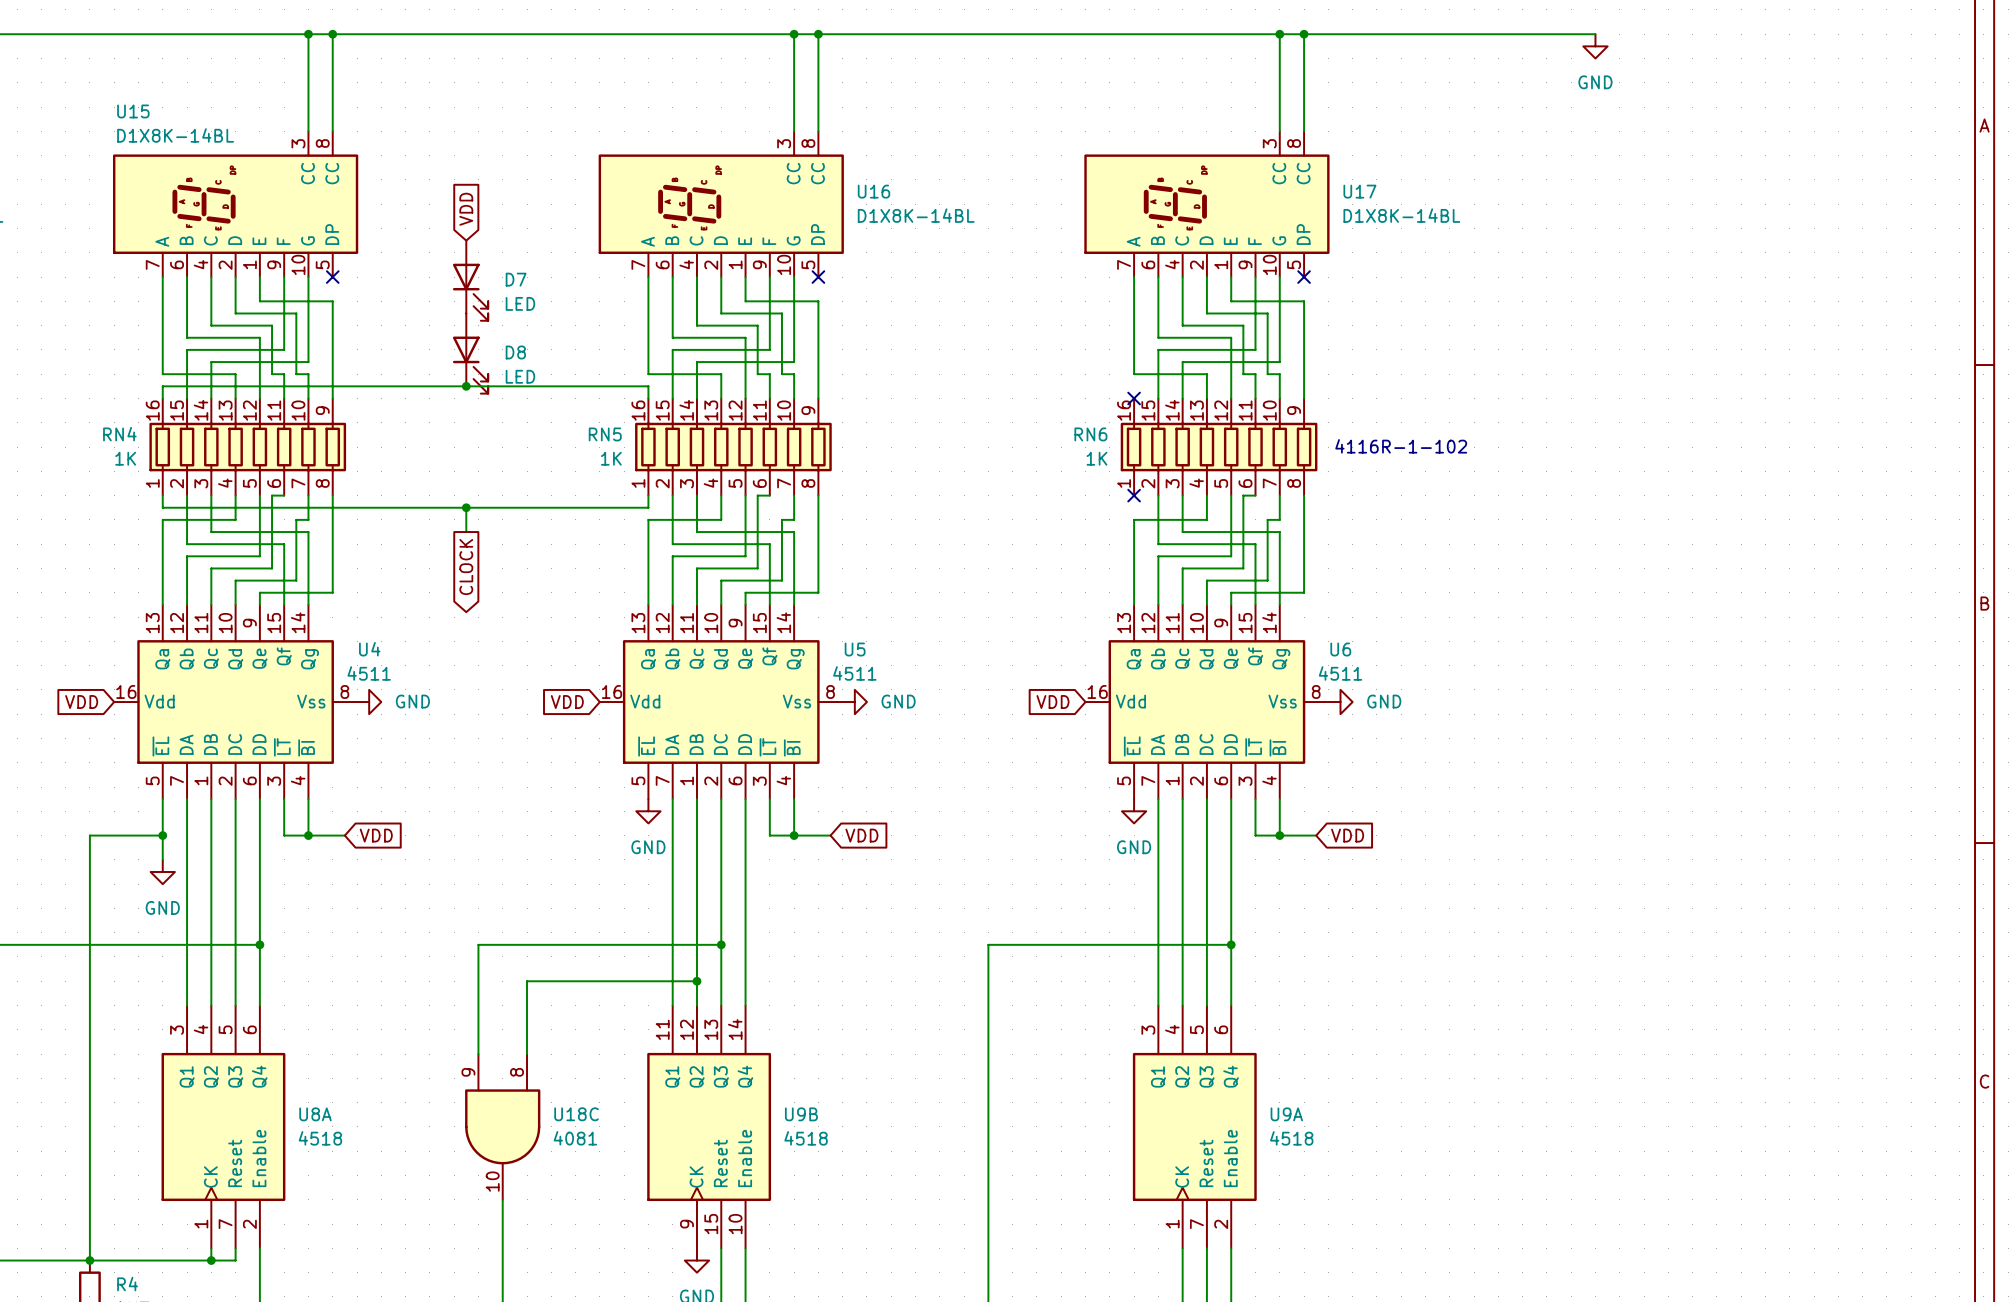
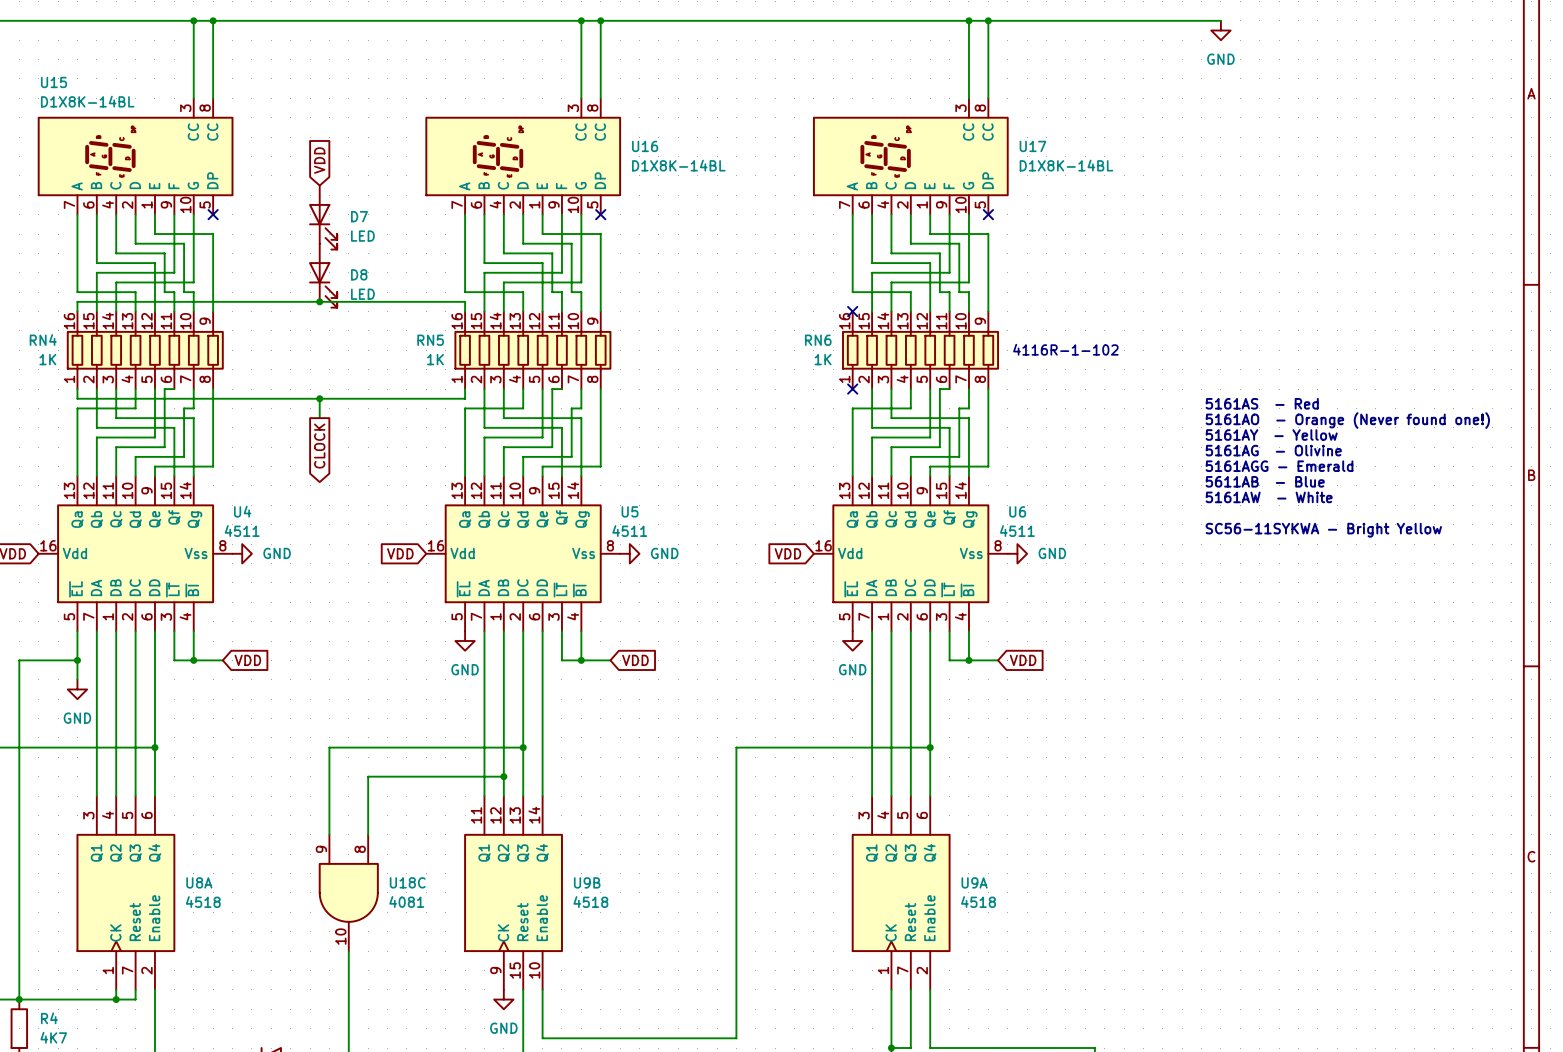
text: none -> 5161AS - Red (1262, 403)
text: none -> 5161AO - Orange (Never found one!) (1347, 420)
text: none -> 5161AY - Yellow (1271, 435)
text: none -> 5161AG - Olivine (1273, 450)
text: none -> 5161AGG - Emerald (1279, 466)
text: none -> 5611AB - Blue (1265, 481)
text: none -> 5161AW - White (1269, 497)
text: none -> SC56-11SYKWA - Bright Yellow (1323, 530)

